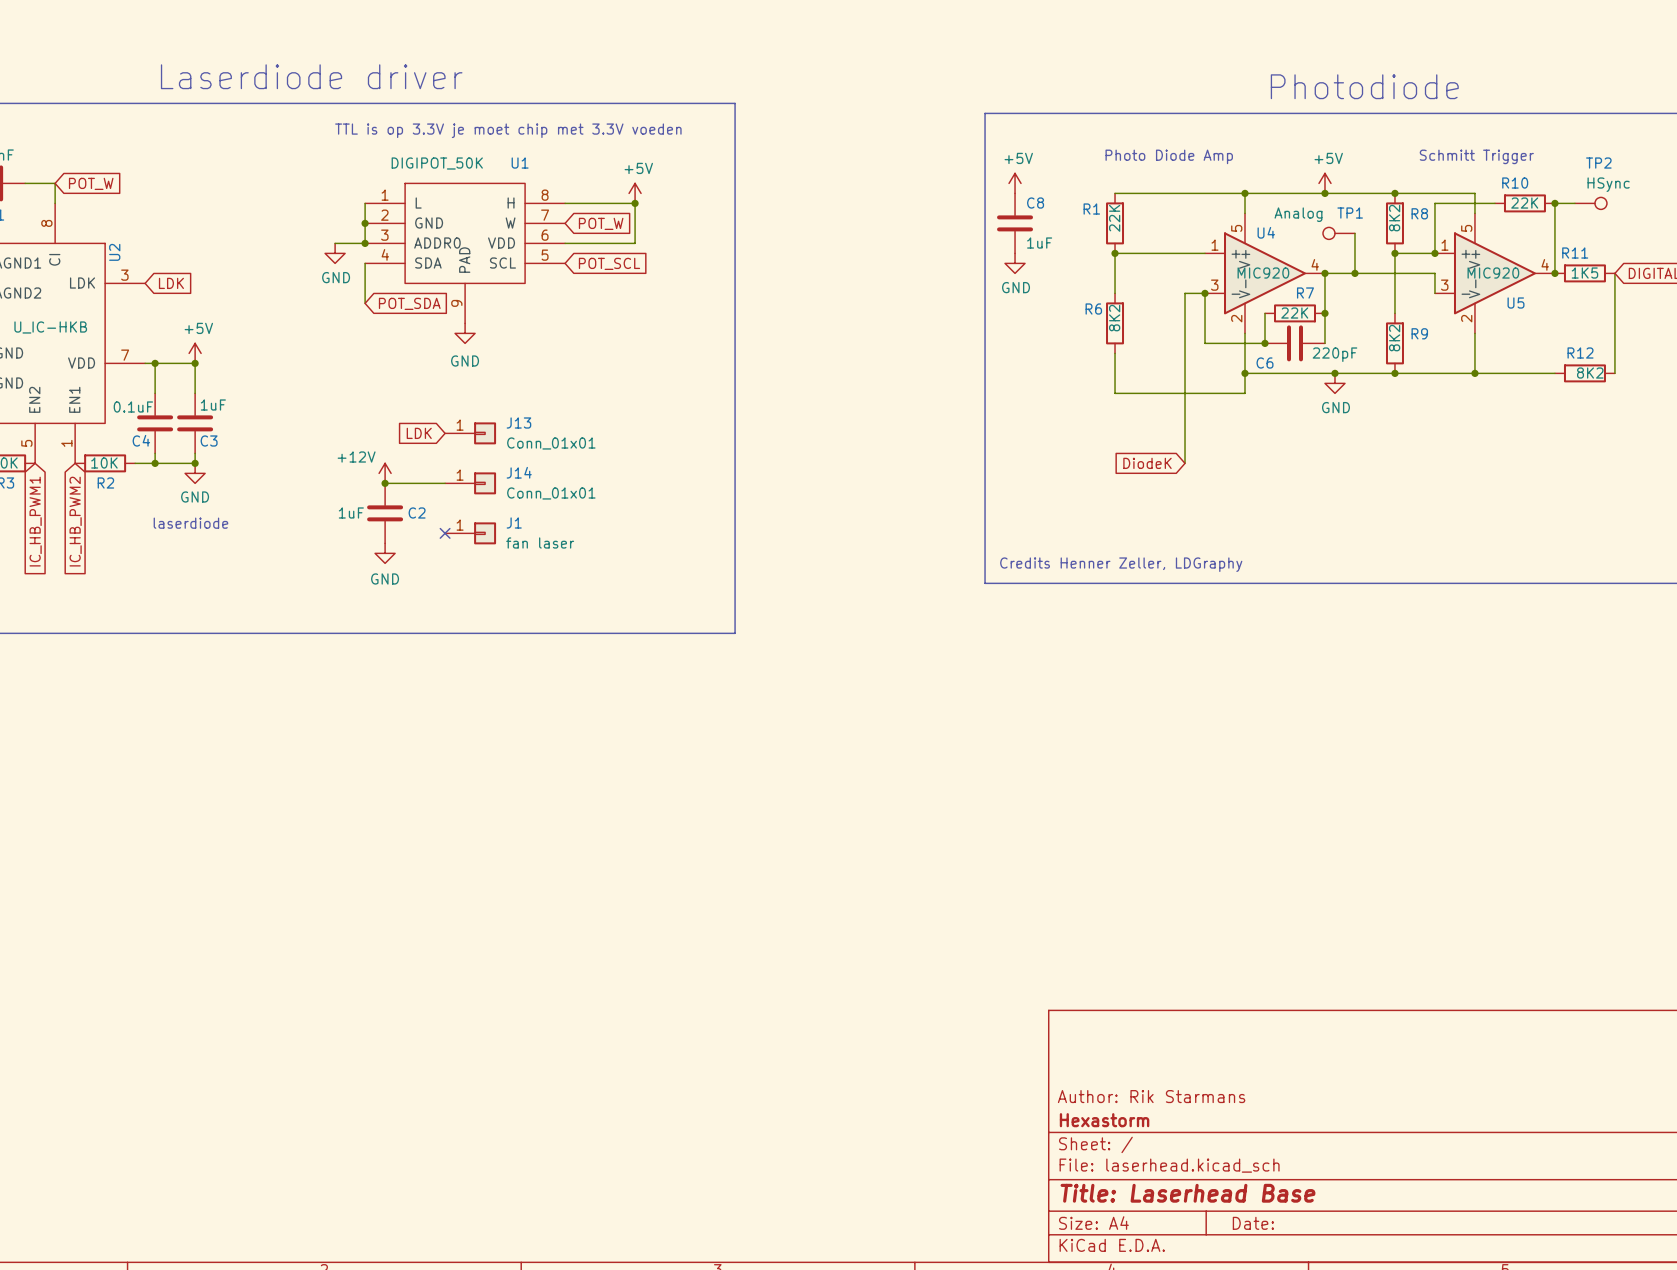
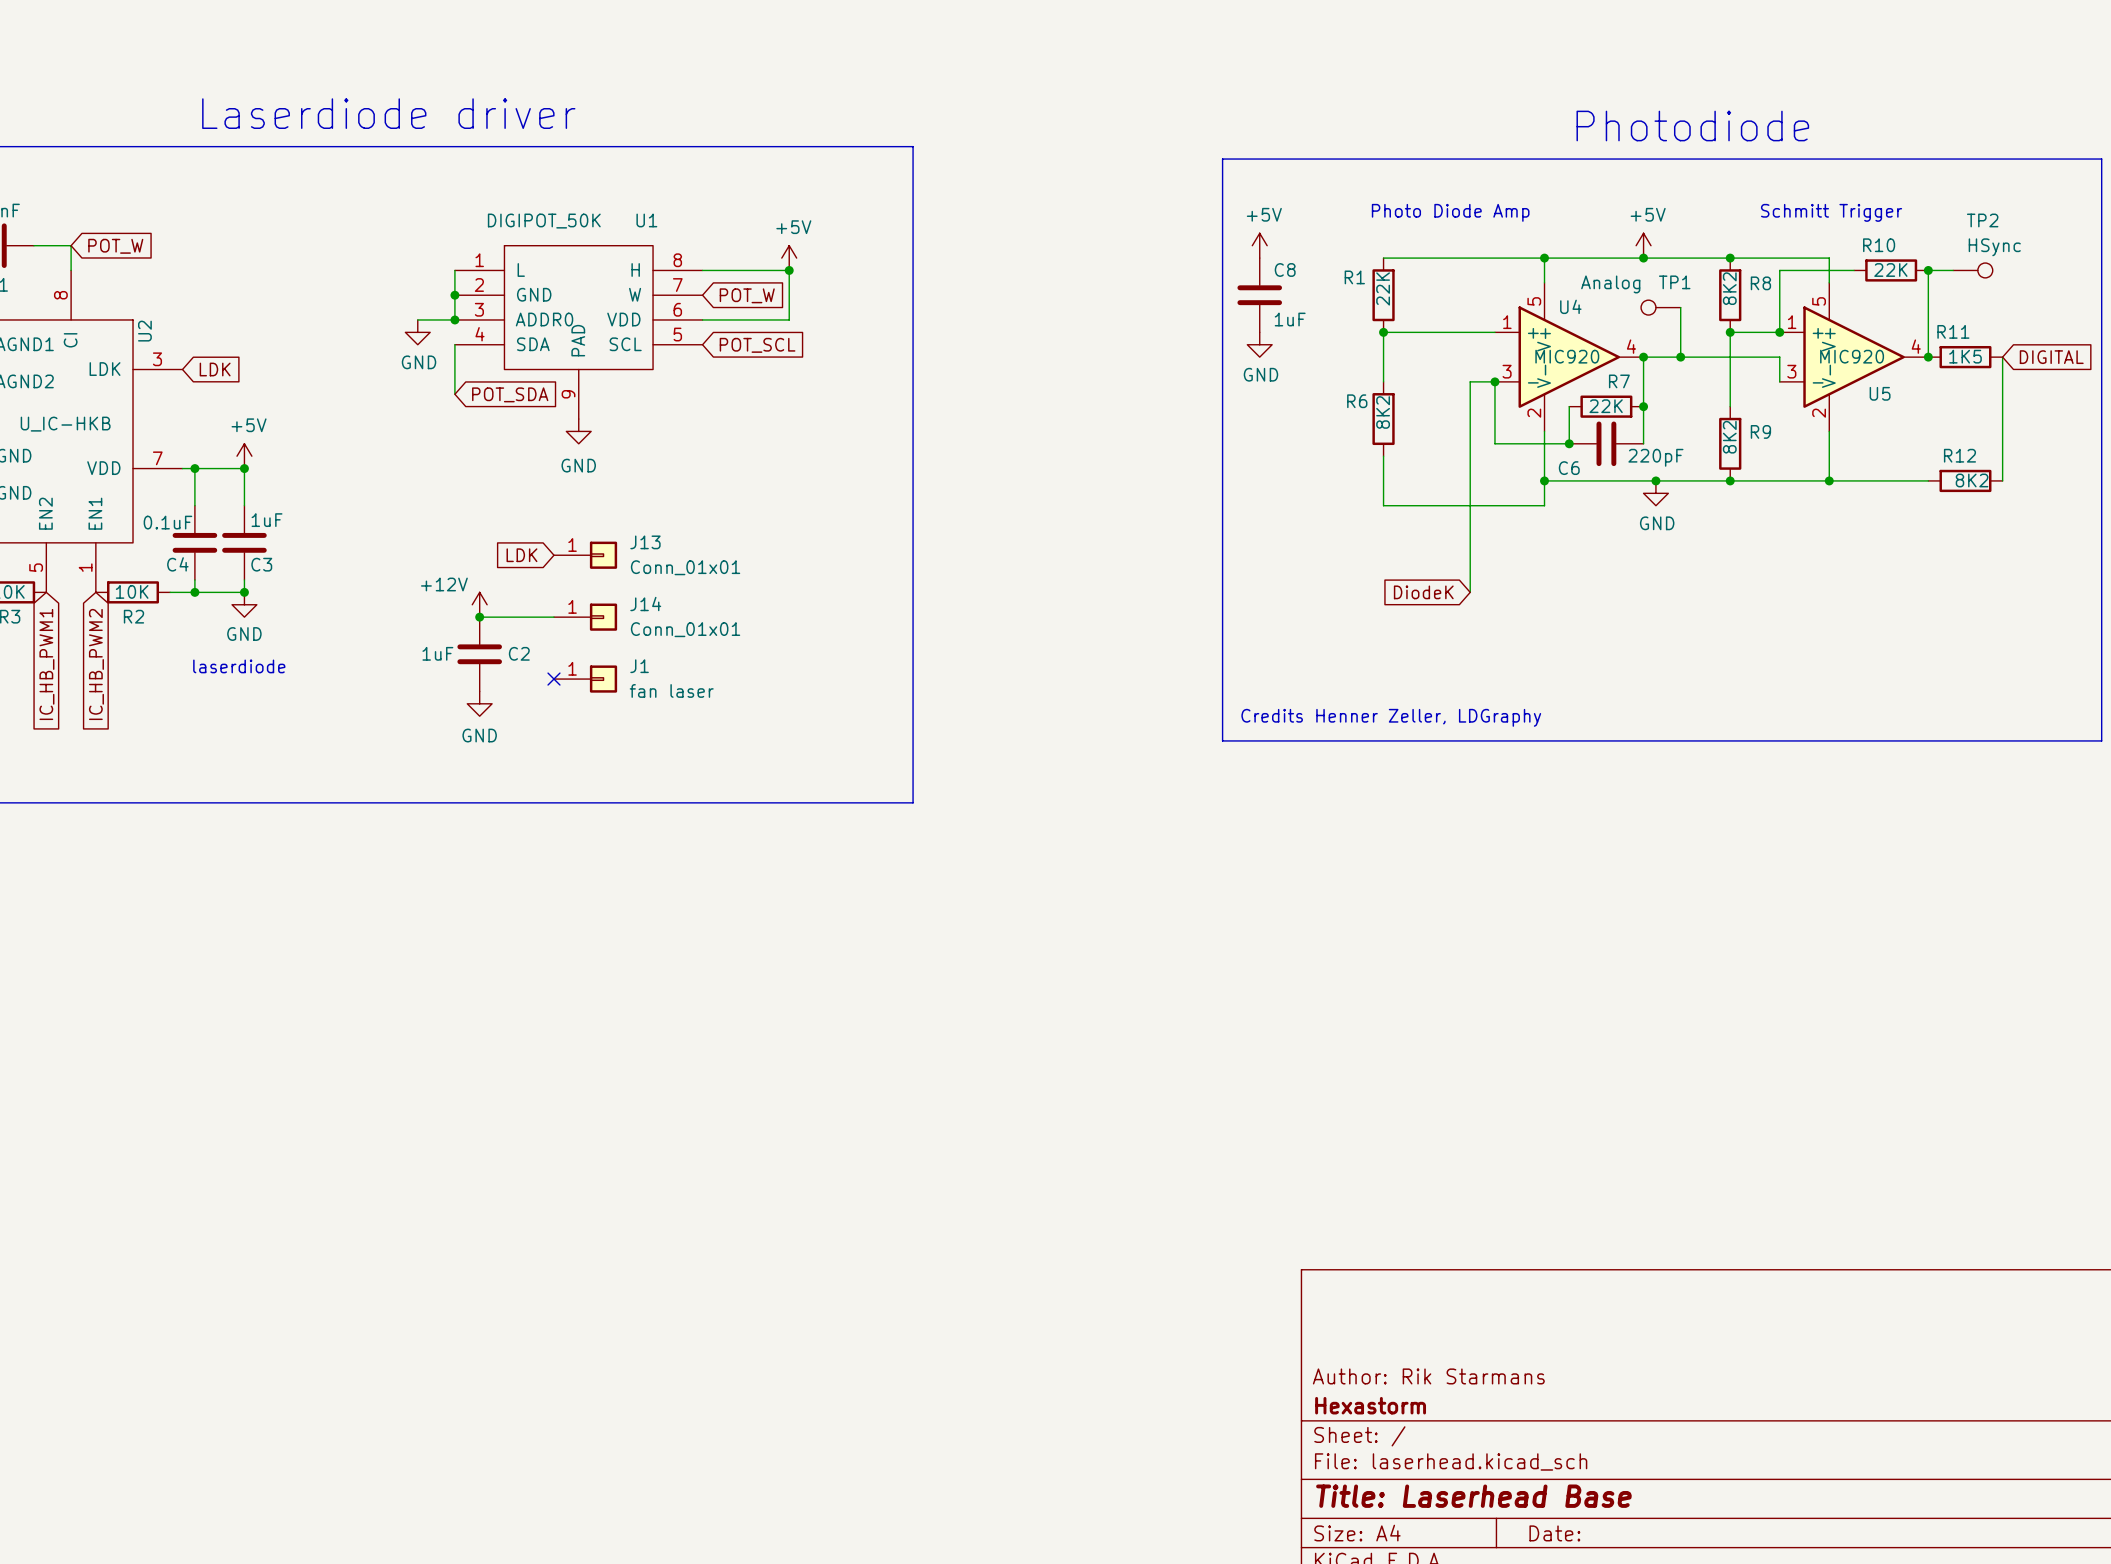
text: TTL is op 3.3V je moet chip met 3.3V voeden (508, 130) -> none

